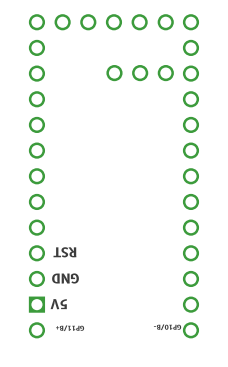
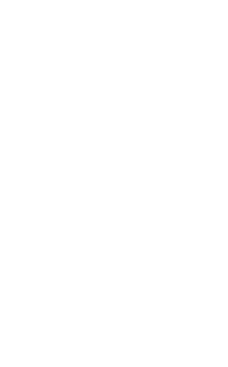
part: (113, 176) -> none

